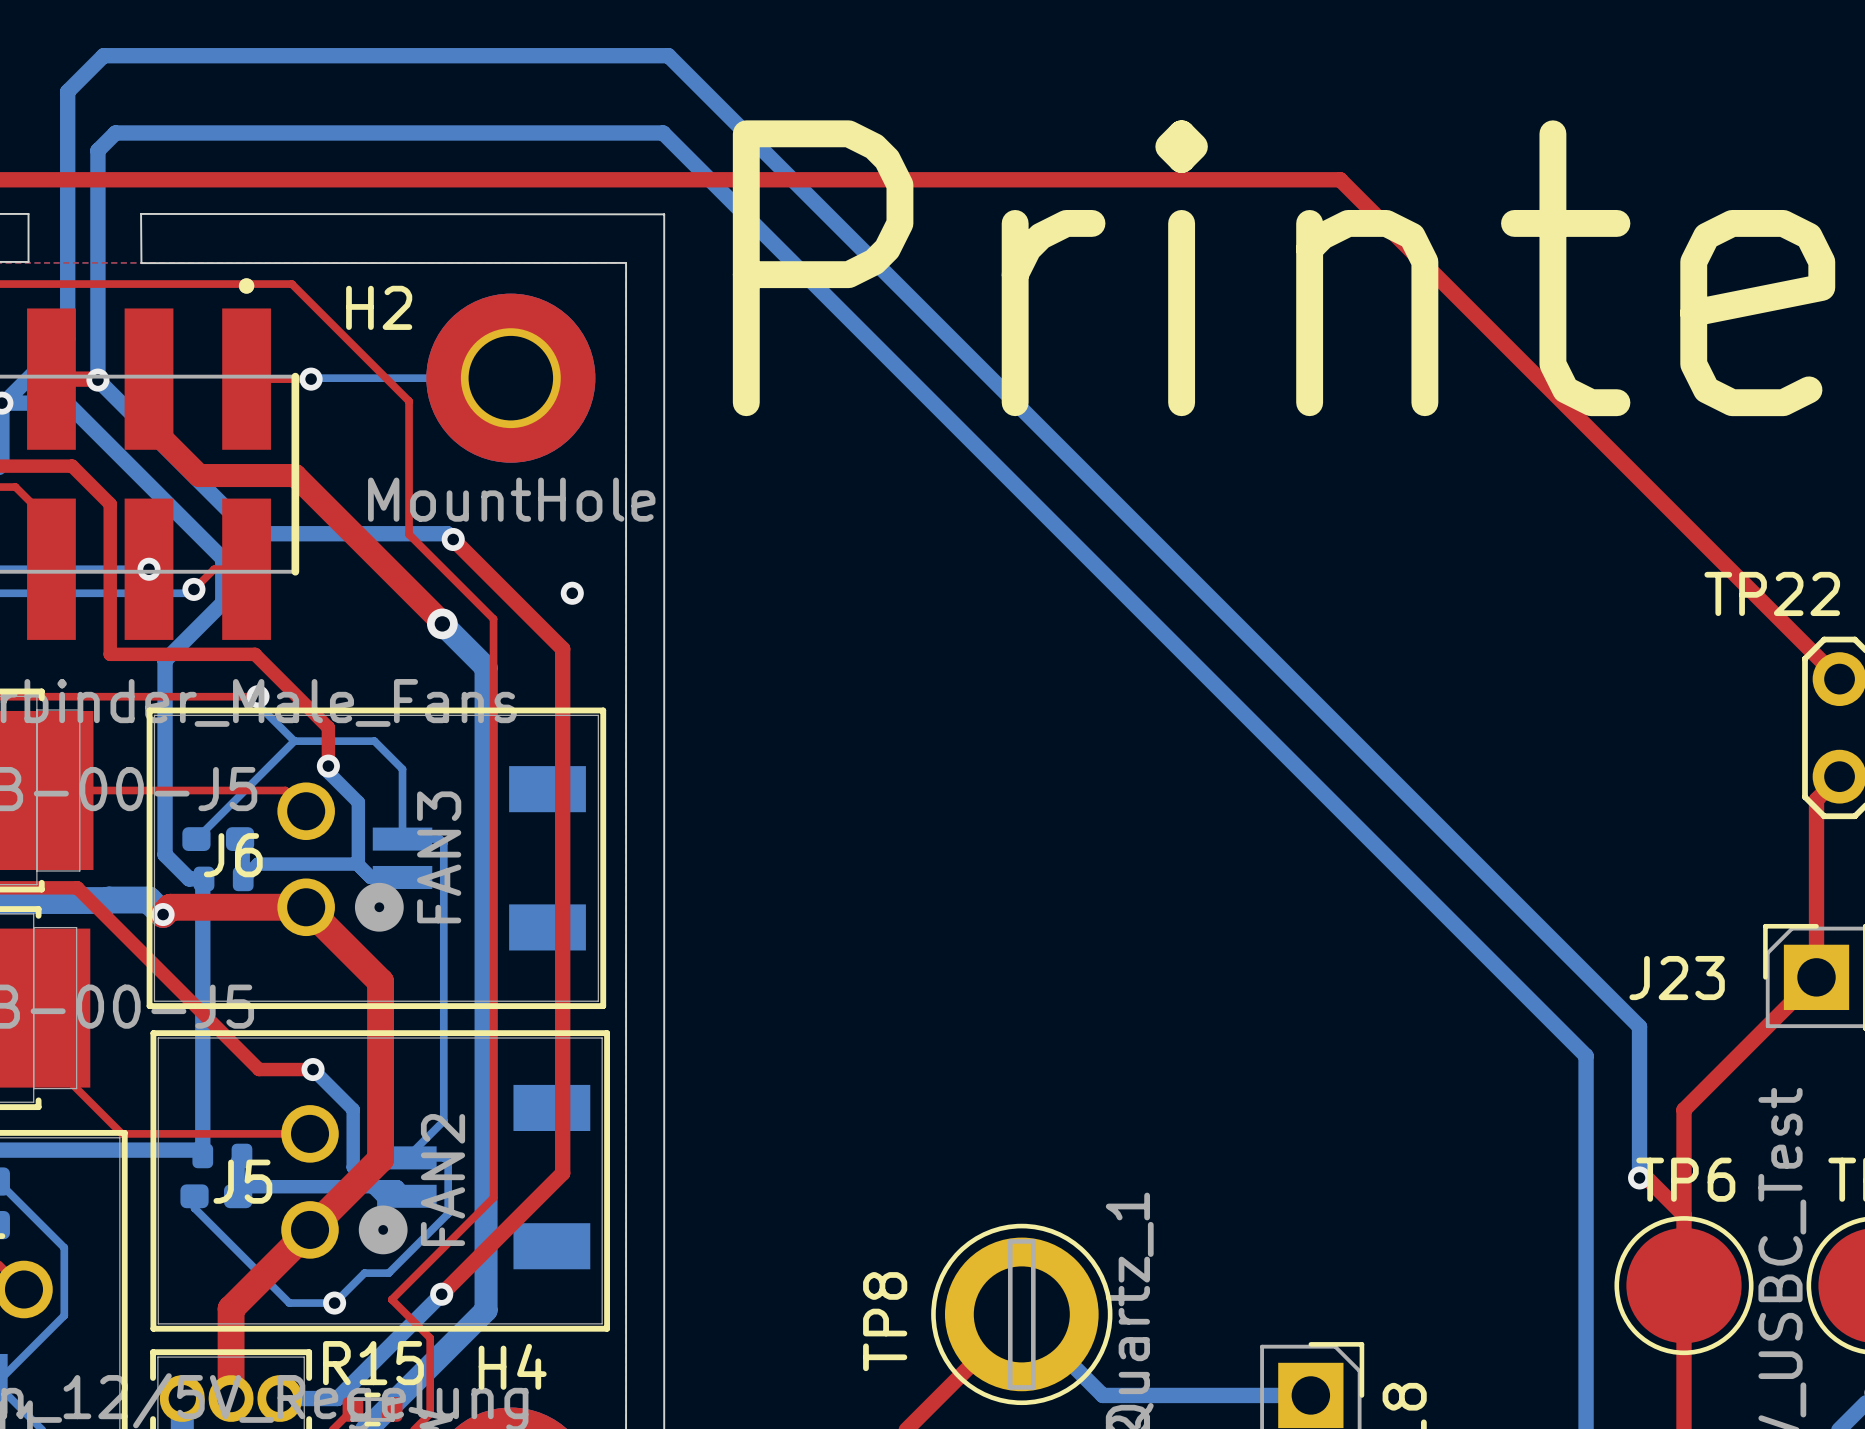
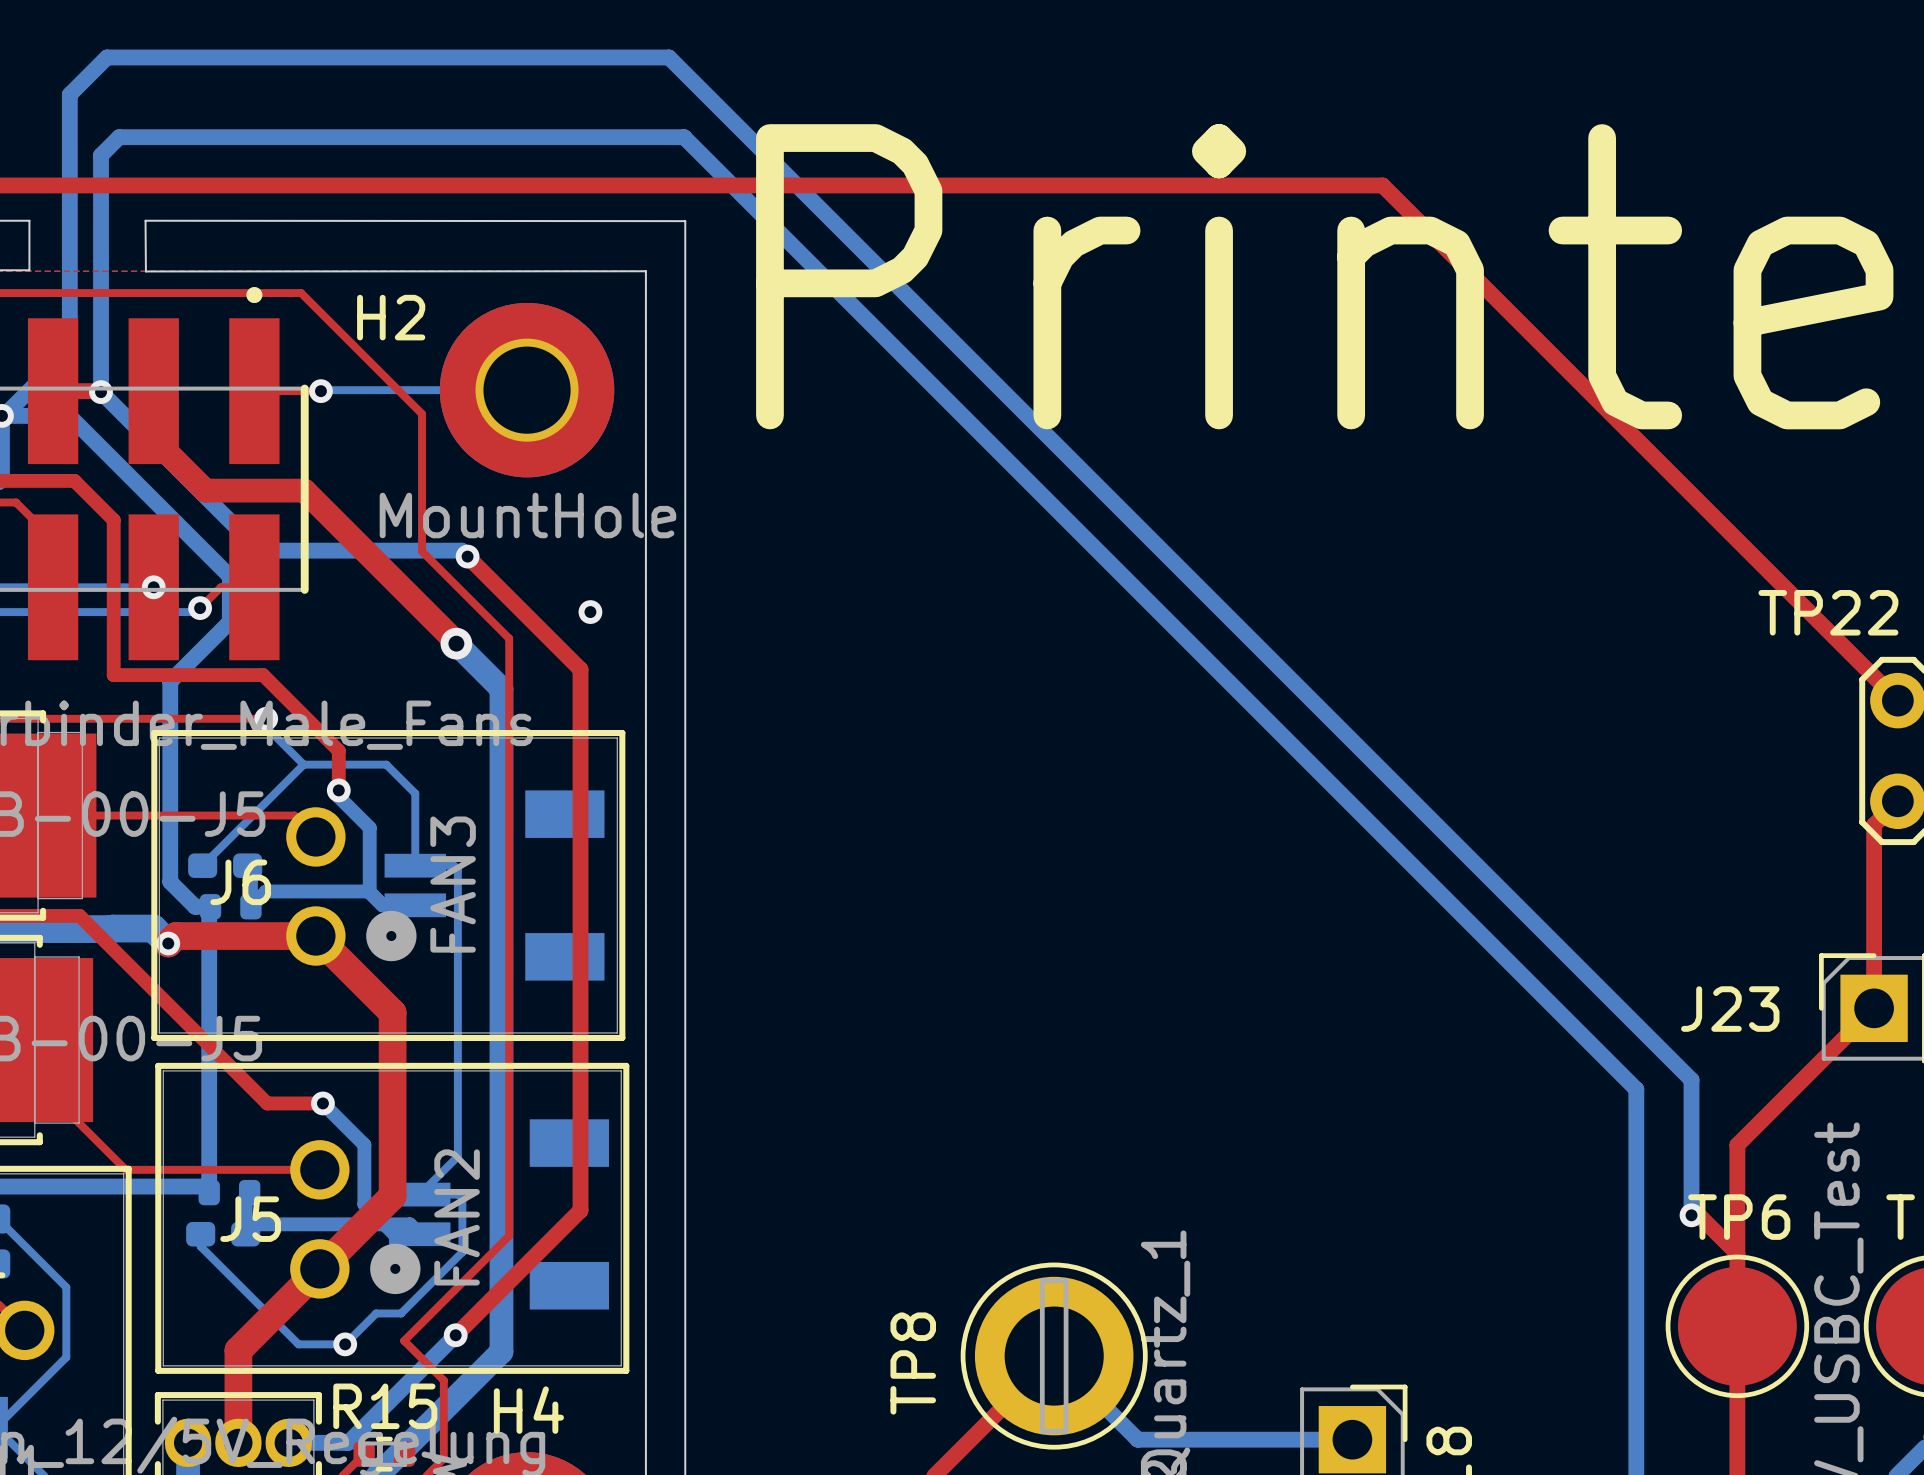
bottom track: (648, 55) (668, 55) (1639, 1026) (1639, 1046) -> (669, 57) (1691, 1079)

